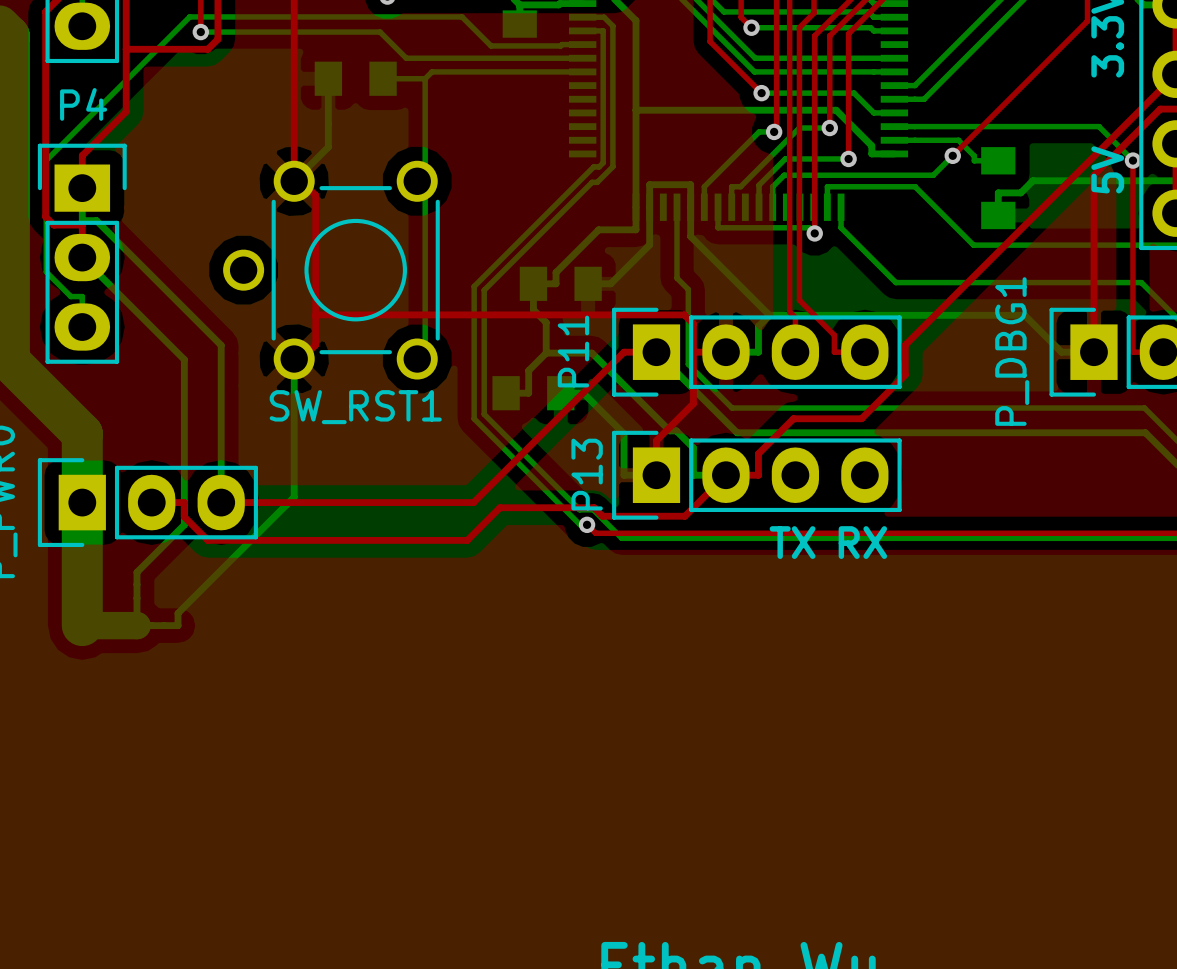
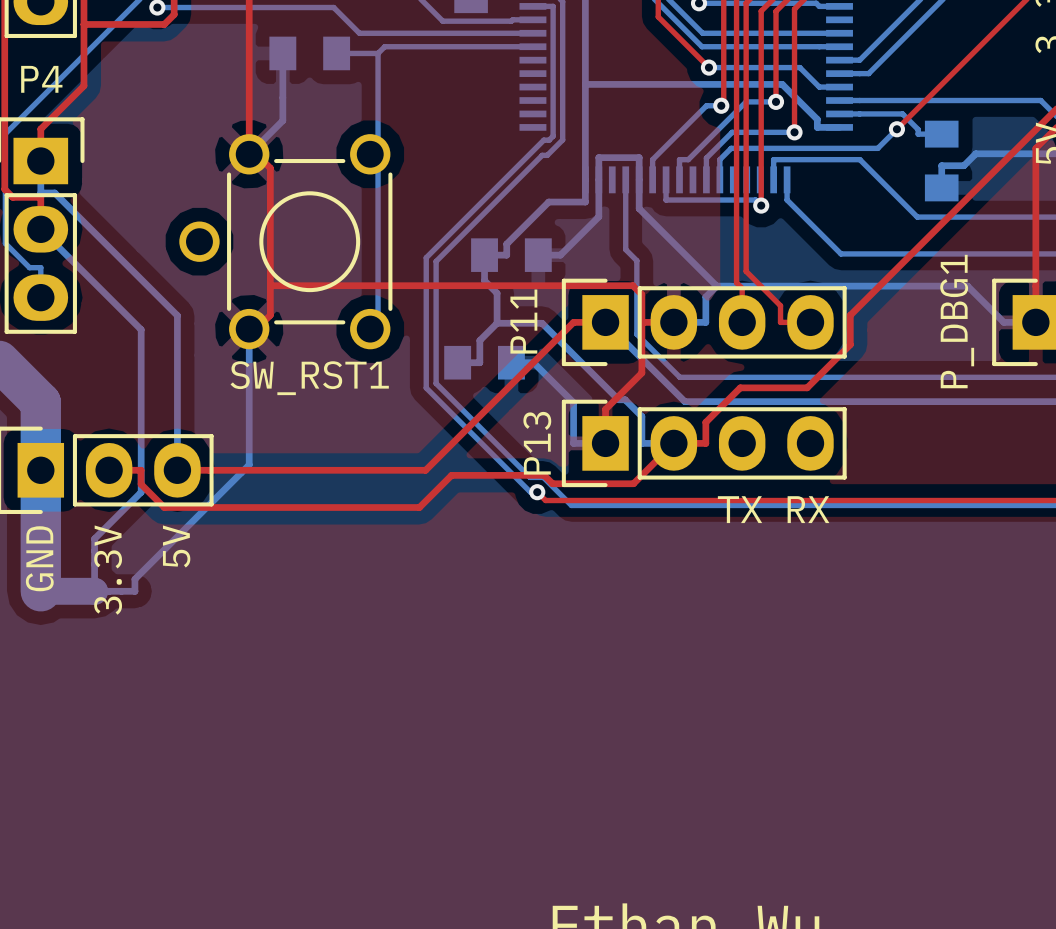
text: none -> 5V (176, 546)
text: none -> GND (39, 558)
text: none -> 3.3V (108, 570)

